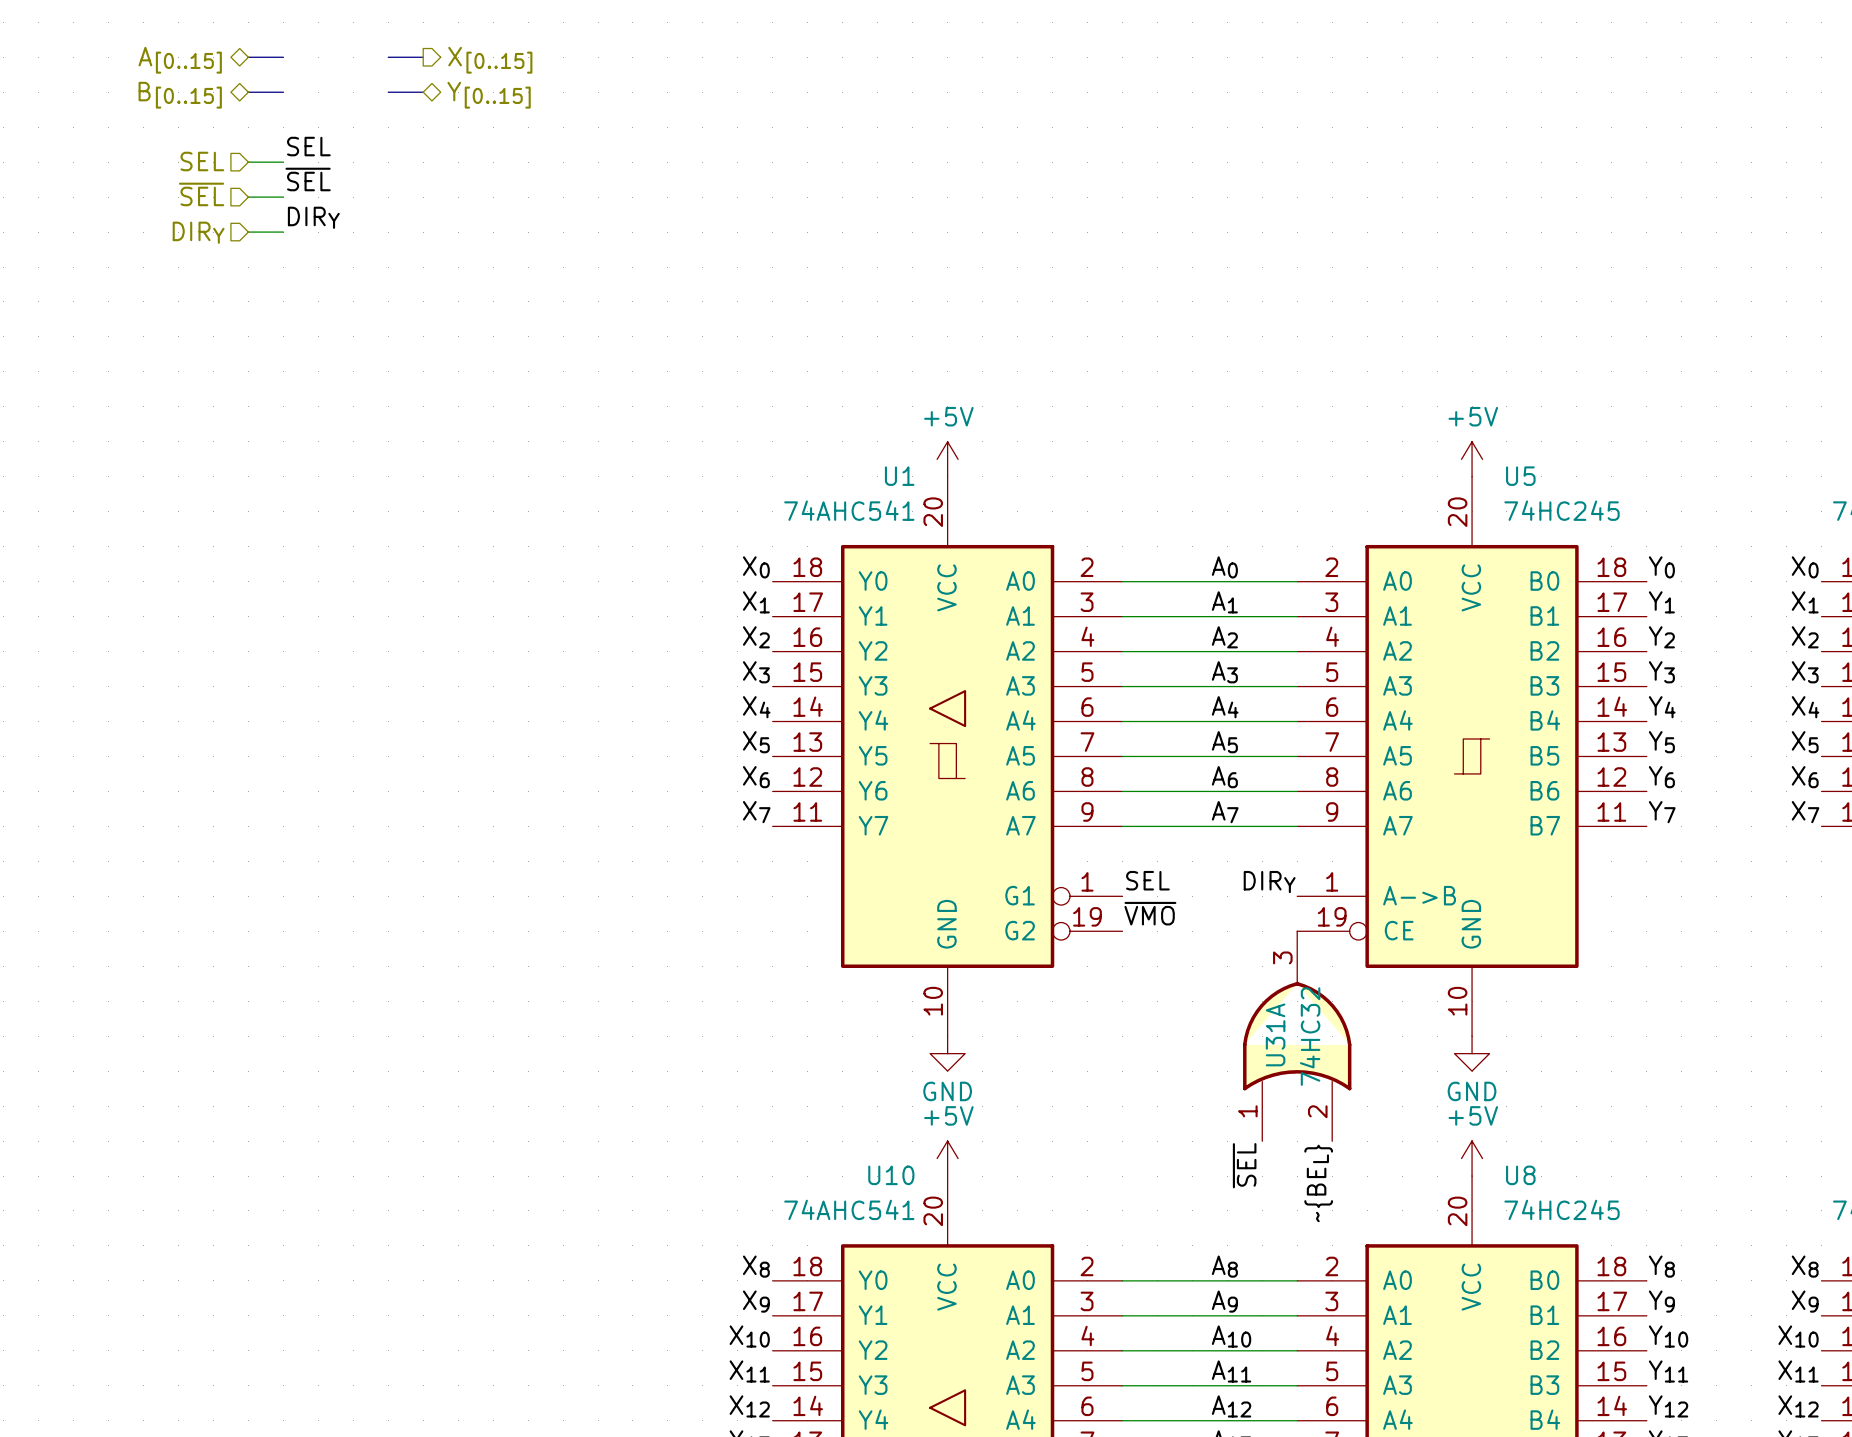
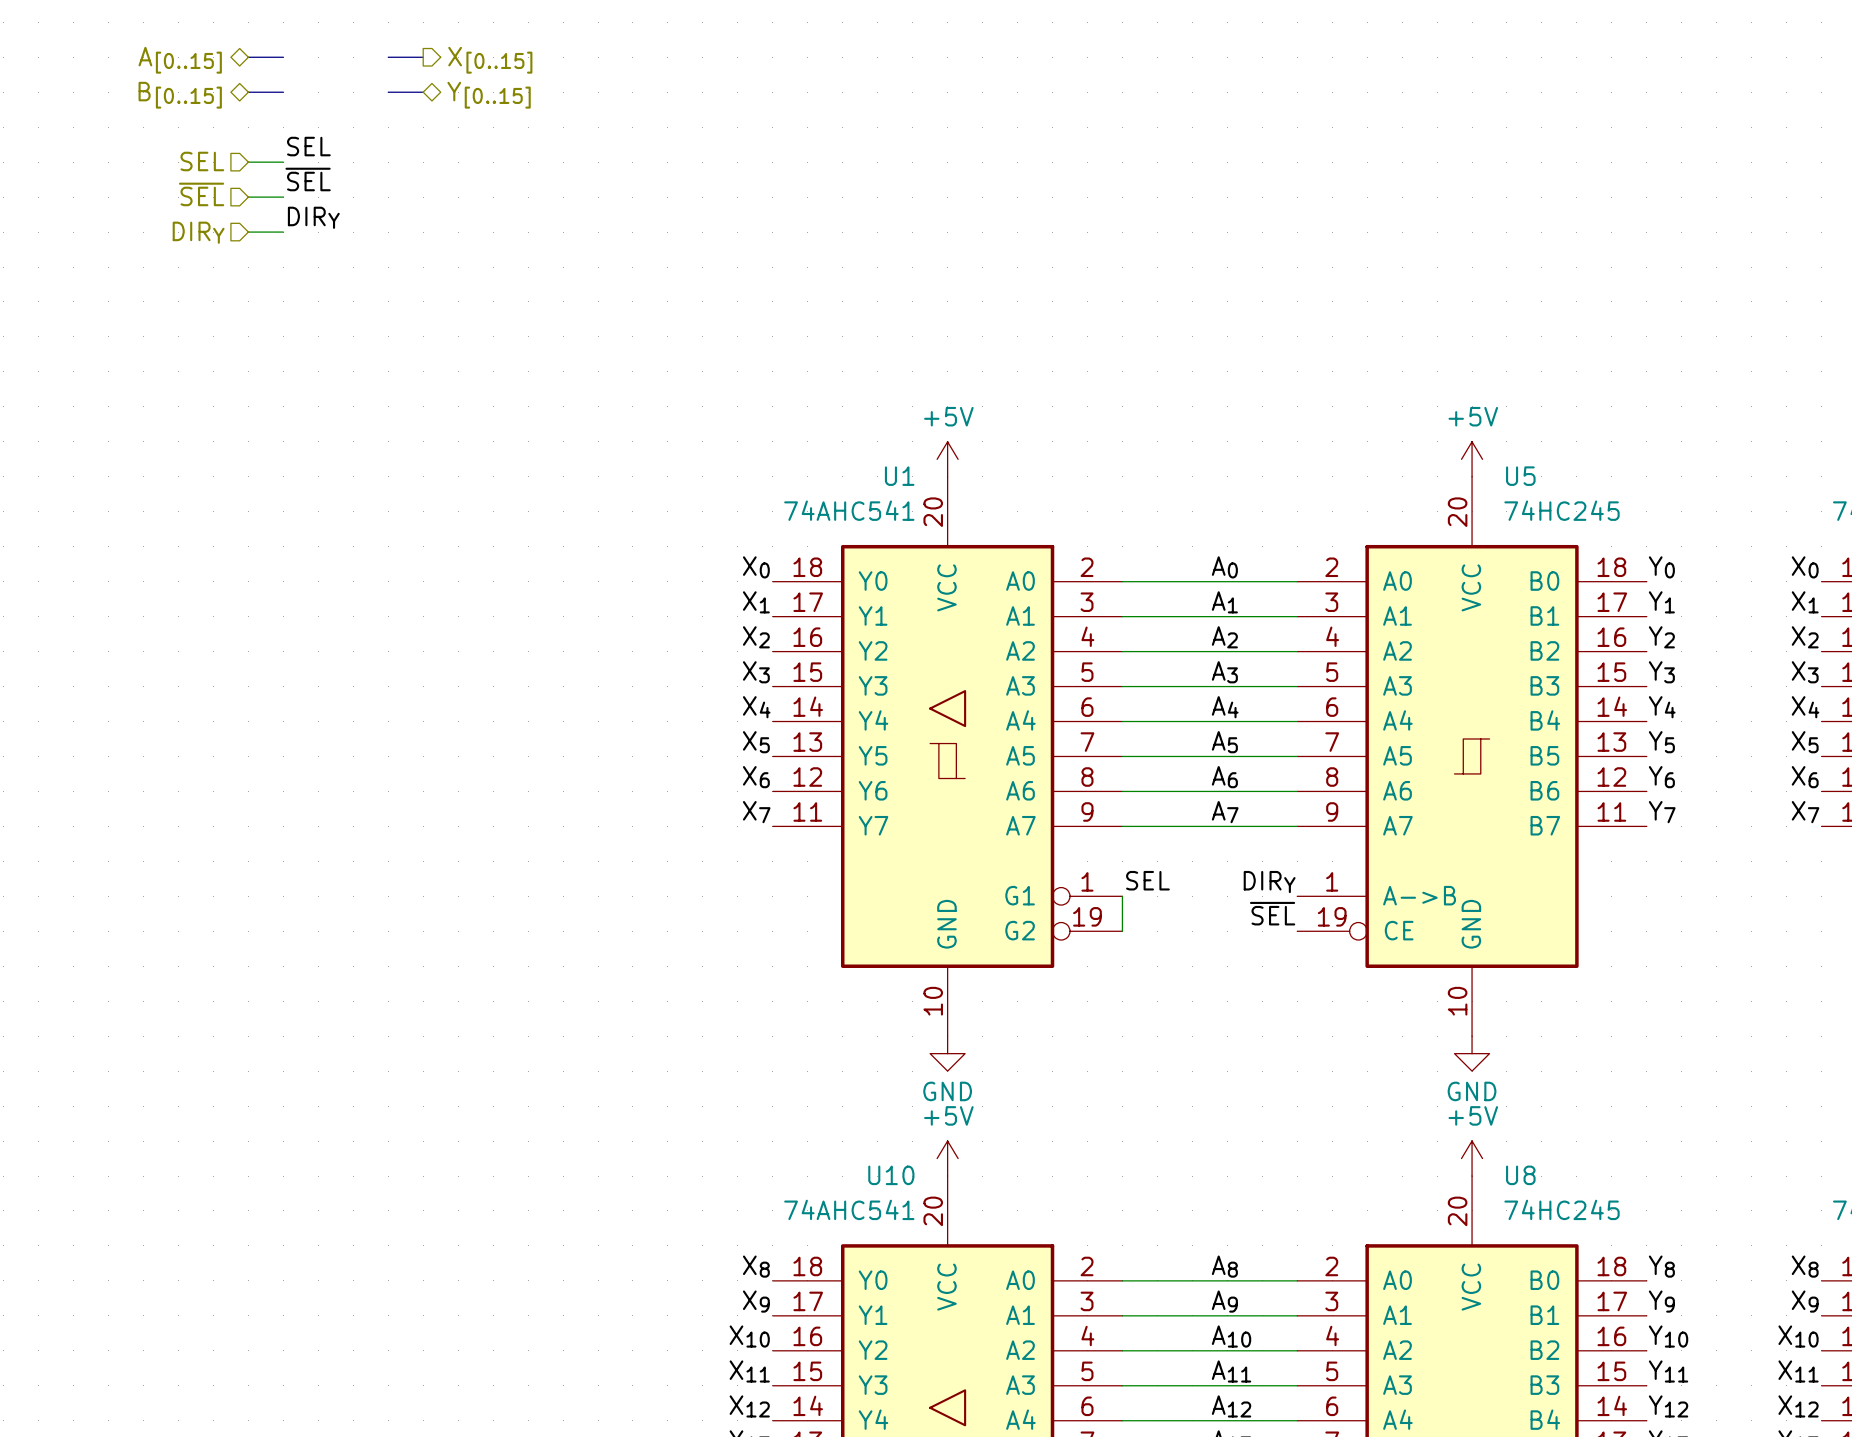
wire: none -> (1122, 896) (1122, 931)
label: ~{VMO} (1150, 913) -> none
U31A: 74HC32 (1297, 1036) -> none
label rotation: 0° (1244, 1165) -> 90° clockwise (1272, 913)
label position: ~{SEL} (1244, 1165) -> ~{SEL} (1272, 913)
label: ~{BEL} (1318, 1183) -> none

